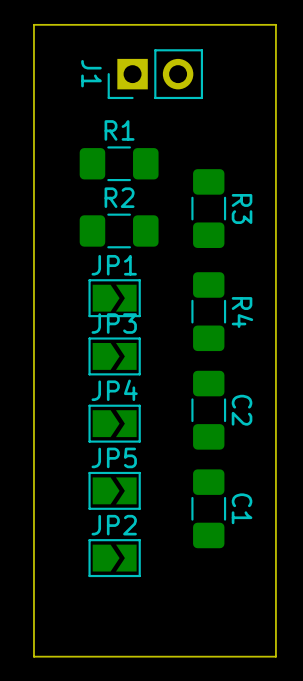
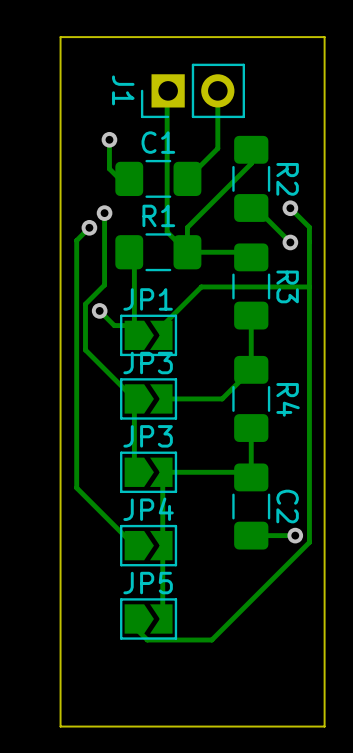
track: none -> (168, 90) (167, 231) (187, 252)
track: none -> (217, 90) (217, 148) (187, 178)
track: none -> (109, 139) (109, 168) (119, 178)
via: none -> (109, 139)
track: none -> (251, 149) (251, 163) (187, 227) (187, 252)
R1 position: (119, 163) -> (158, 252)
track: none -> (251, 207) (255, 207) (290, 242)
track: none -> (290, 208) (309, 227) (309, 542) (211, 640) (147, 640) (134, 626) (134, 618)
via: none -> (290, 208)
track: none -> (104, 213) (104, 285) (85, 304) (85, 350) (134, 398) (134, 472)
via: none -> (104, 213)
track: none -> (89, 227) (76, 240) (76, 487) (134, 545)
via: none -> (89, 227)
R3 position: (208, 208) -> (251, 286)
via: none -> (290, 242)
track: none -> (119, 252) (134, 267) (134, 325) (114, 325) (99, 310)
track: none -> (187, 252) (246, 252) (251, 257)
R2 rotation: 0° (119, 230) -> 90° clockwise (251, 178)
R2 position: (119, 230) -> (251, 178)
track: none -> (309, 286) (201, 286) (162, 325)
via: none -> (99, 310)
track: none -> (251, 315) (251, 369) (222, 398) (162, 398)
R4 position: (208, 311) -> (251, 398)
track: none -> (251, 428) (251, 477) (246, 472) (162, 472) (162, 618)
JP4 name: JP4 (114, 390) -> JP3 (148, 436)
C2 position: (208, 410) -> (251, 506)
JP5 name: JP5 (114, 457) -> JP4 (148, 509)
track: none -> (295, 535) (251, 535)
via: none -> (295, 535)
C1 rotation: 0° (208, 508) -> 90° clockwise (158, 178)
C1 position: (208, 508) -> (158, 178)
C1 name position: C1 (242, 508) -> C1 (158, 142)
JP2 name: JP2 (114, 525) -> JP5 (148, 583)

